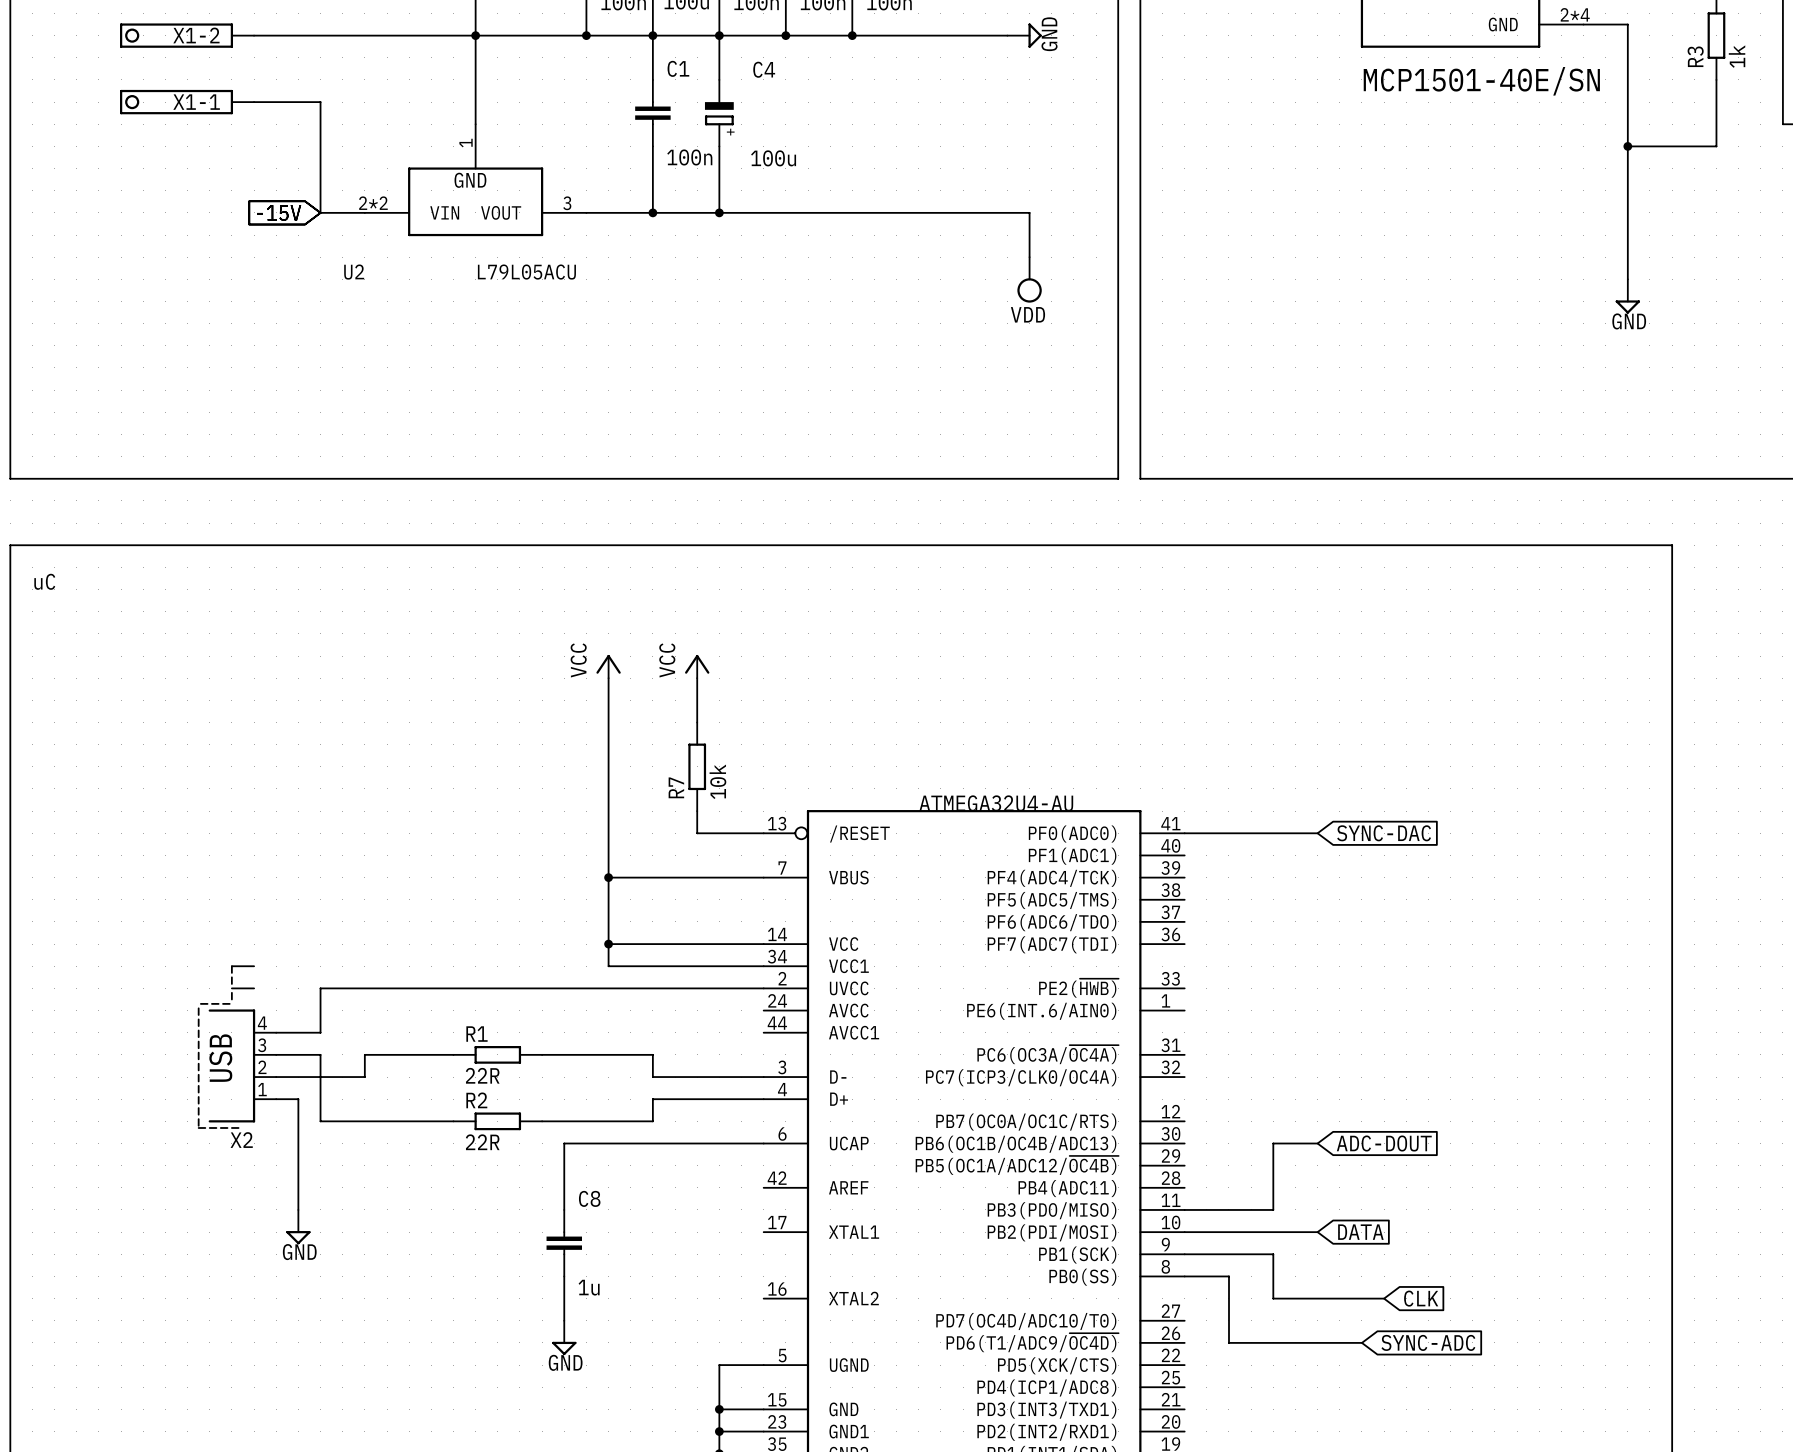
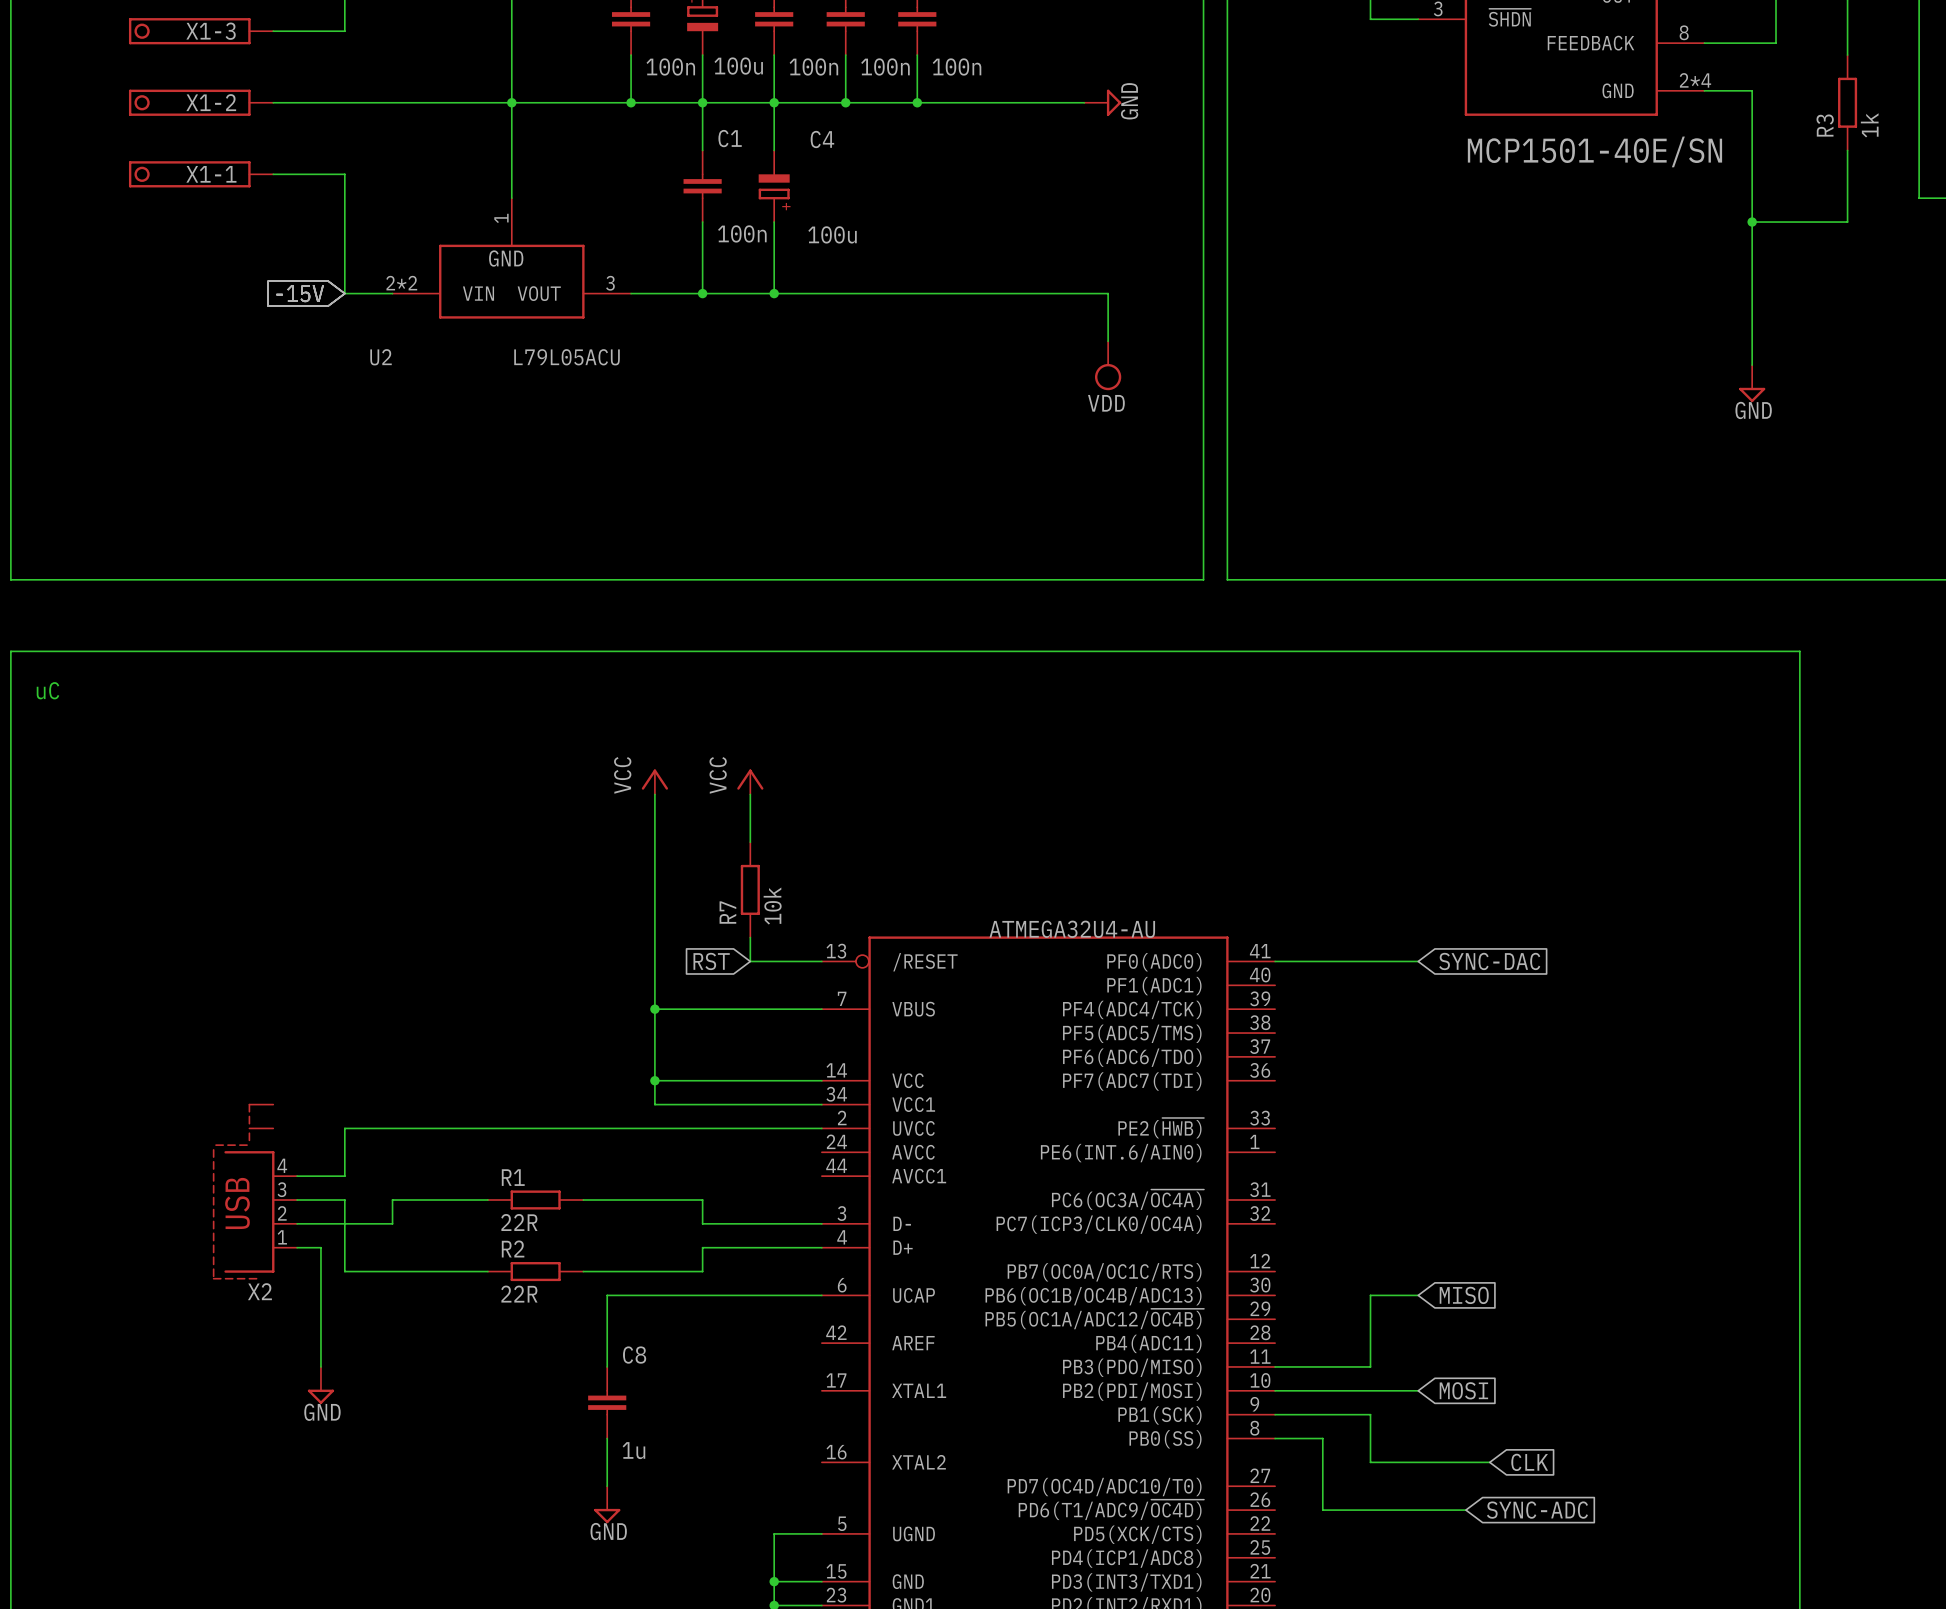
global label: none -> RST (711, 961)
global label: ADC-DOUT (1384, 1143) -> MISO (1464, 1295)
global label: DATA (1360, 1232) -> MOSI (1463, 1390)

